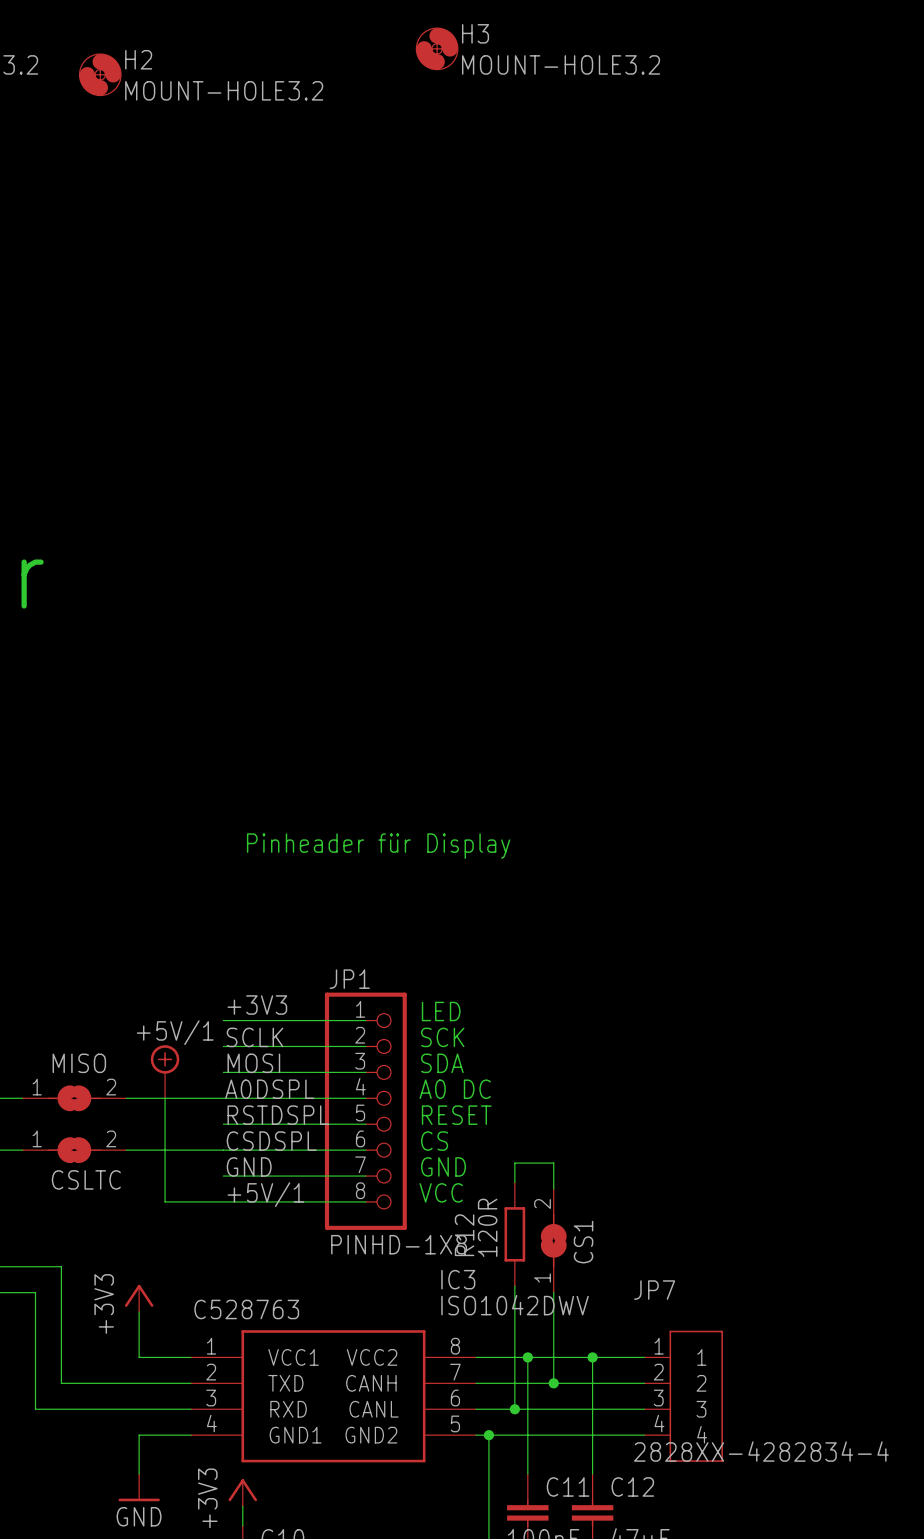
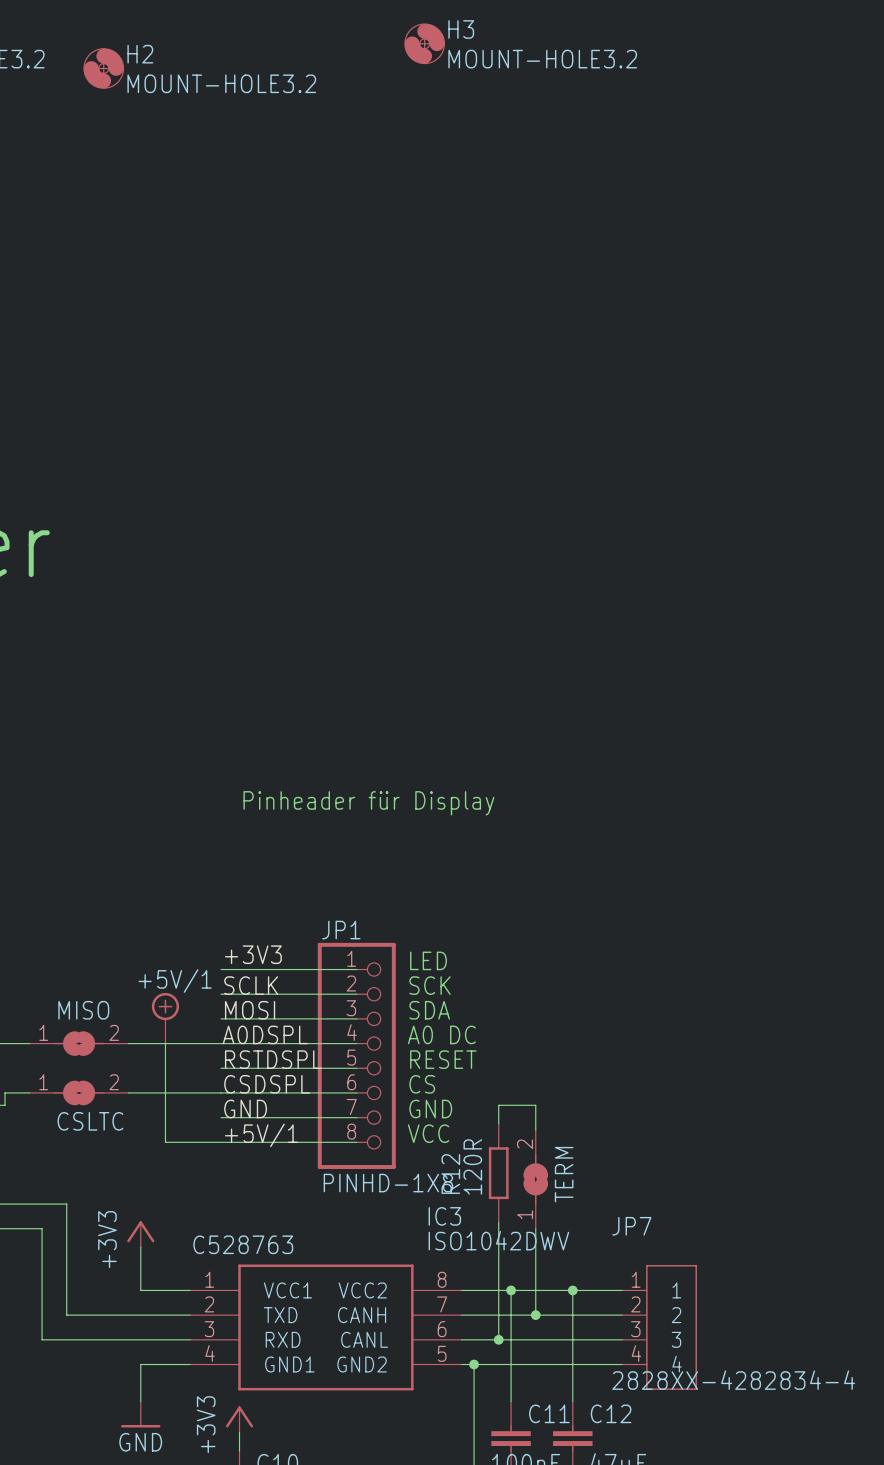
CS1 name: CS1 (583, 1242) -> TERM (564, 1174)

